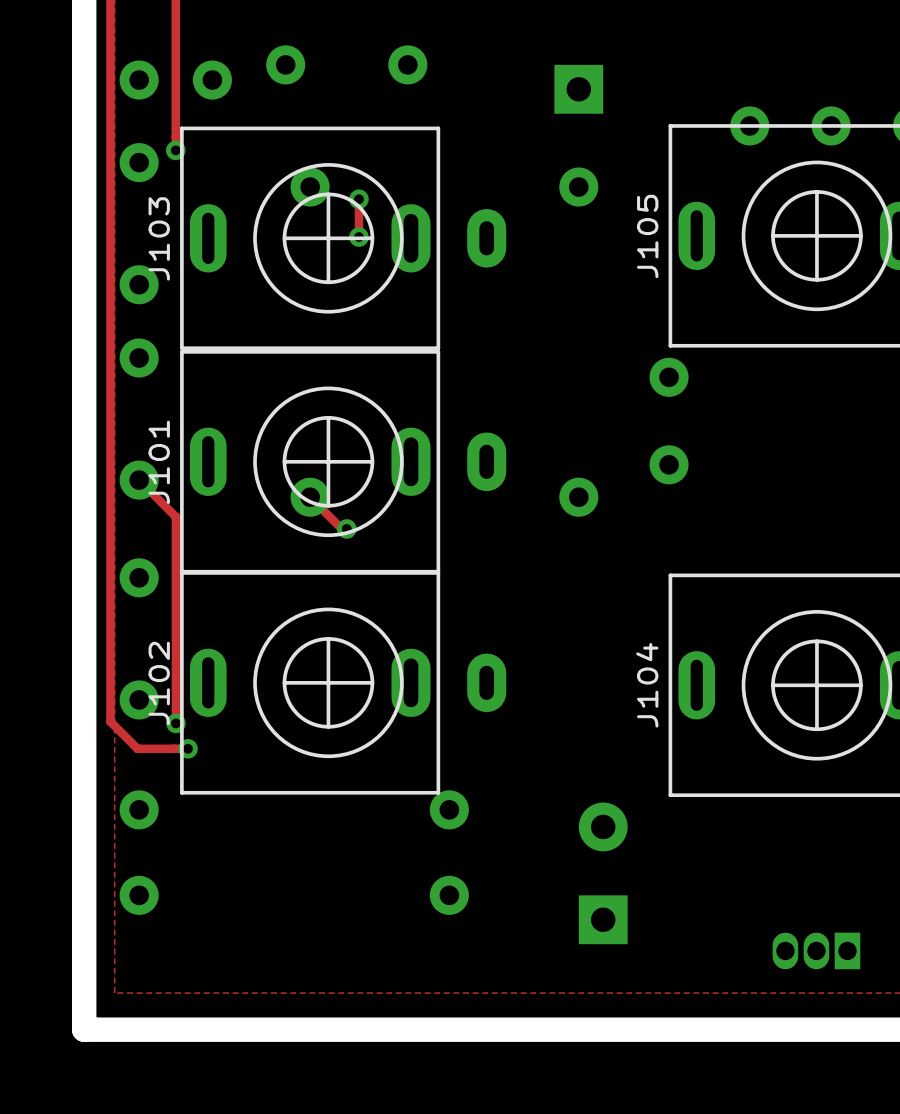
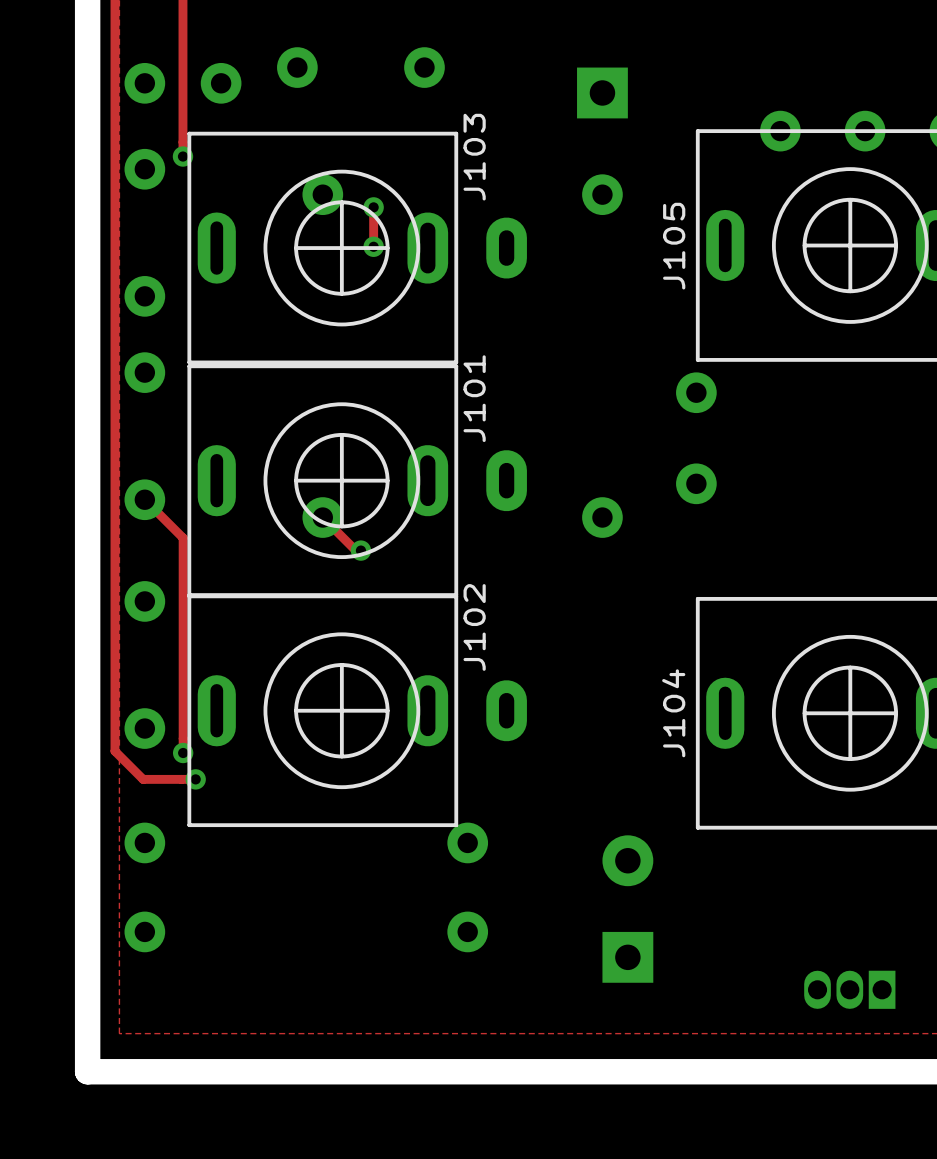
J103 name position: J103 (159, 238) -> J103 (474, 157)
J101 name position: J101 (159, 462) -> J101 (474, 398)
J102 name position: J102 (159, 683) -> J102 (474, 627)

